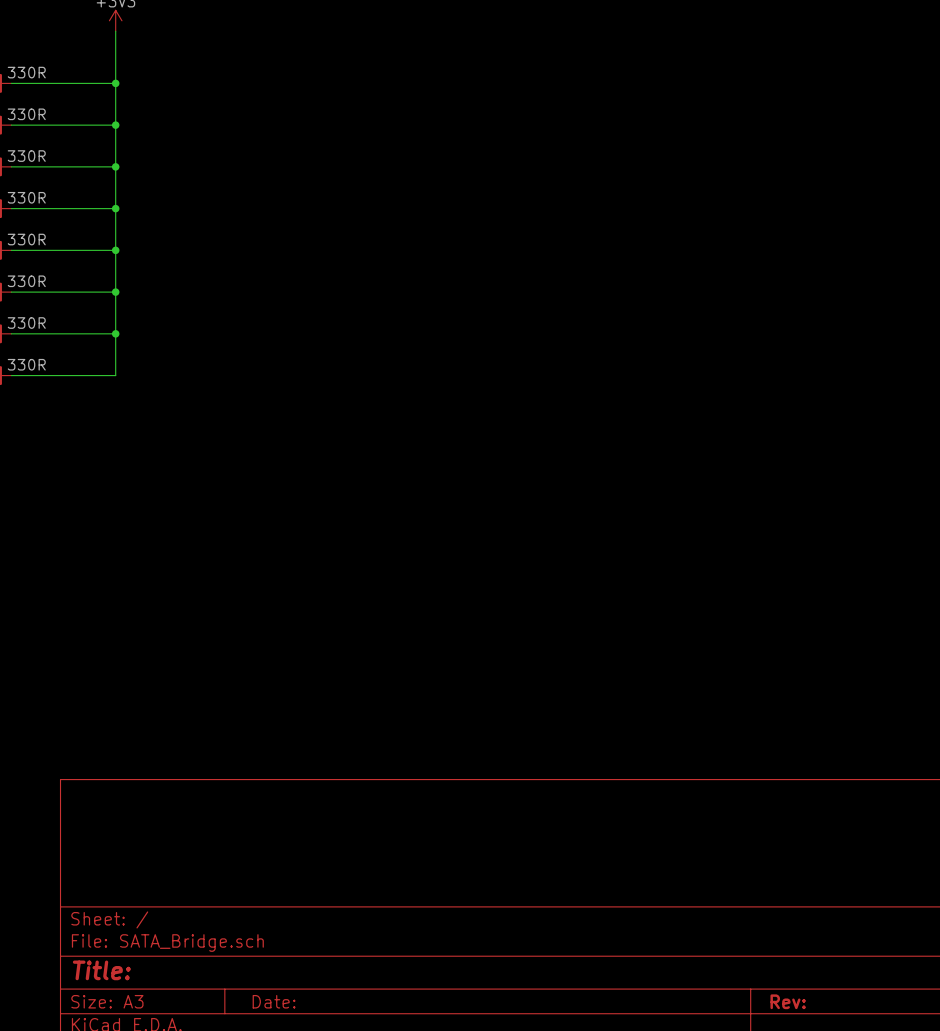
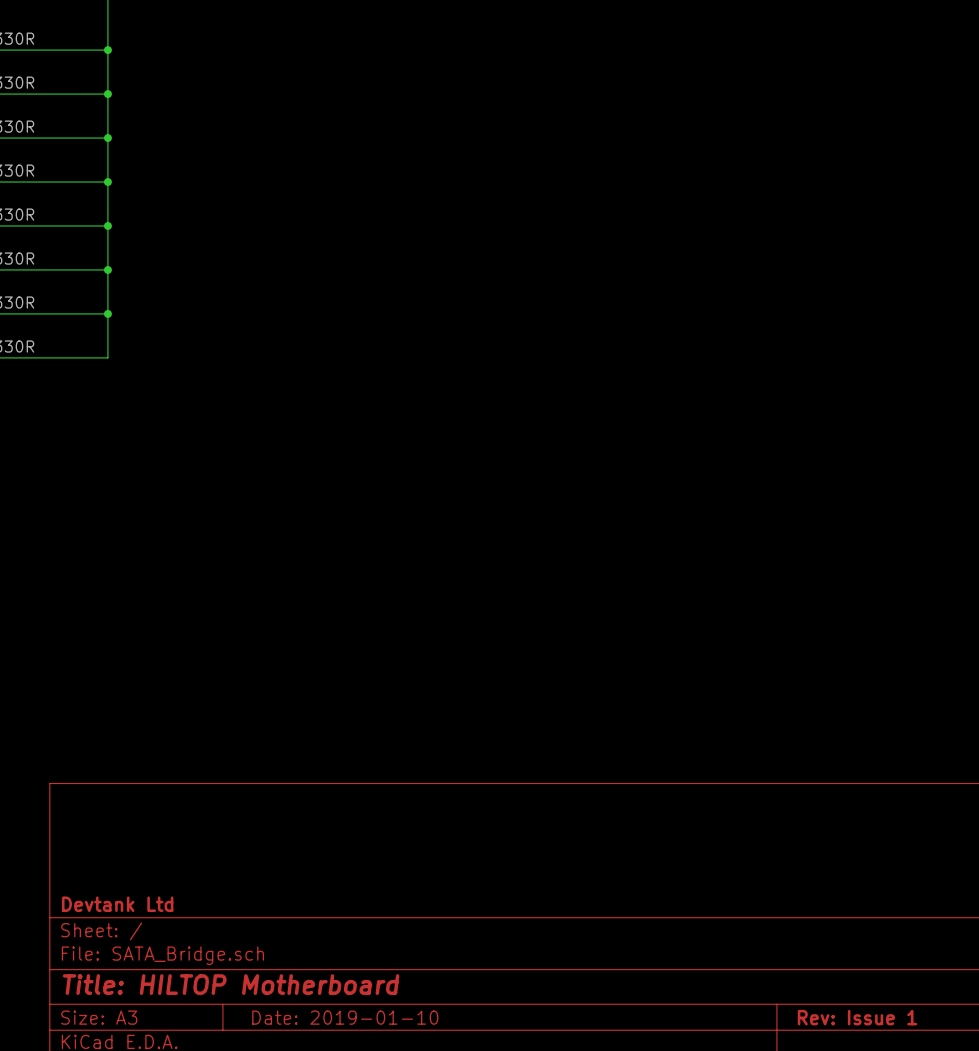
title block: none -> Devtank Ltd (117, 904)
title block: Title: (101, 970) -> Title: HILTOP Motherboard (231, 984)
title block: Date: (274, 1001) -> Date: 2019-01-10 (345, 1017)
title block: Rev: (788, 1001) -> Rev: Issue 1 (857, 1017)

